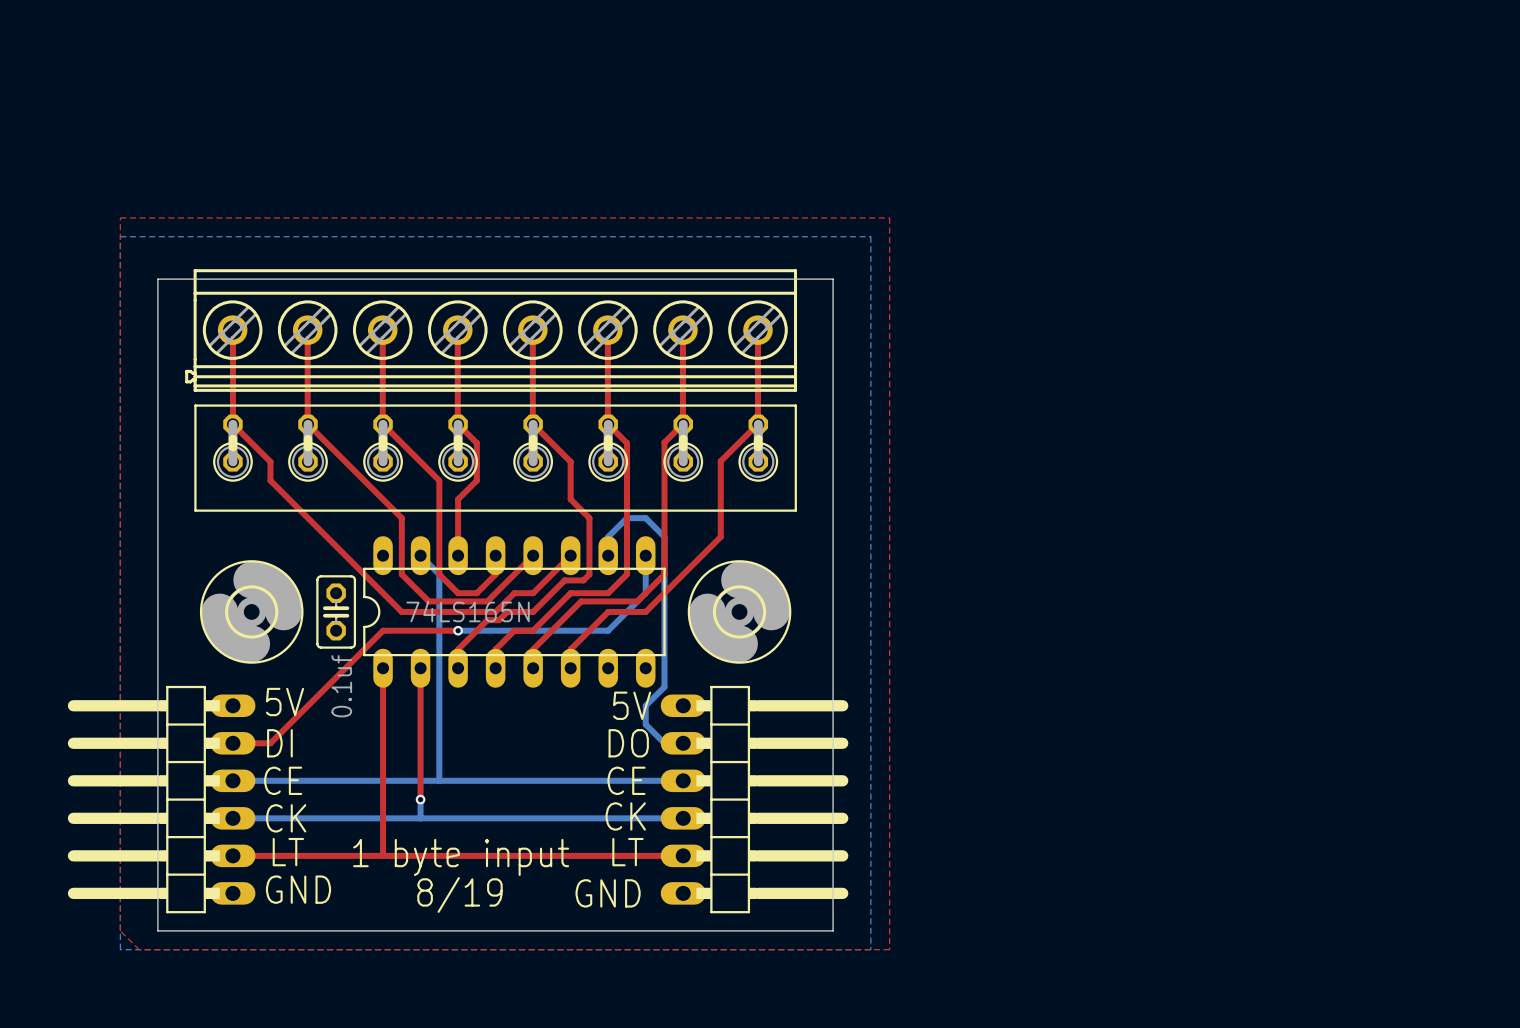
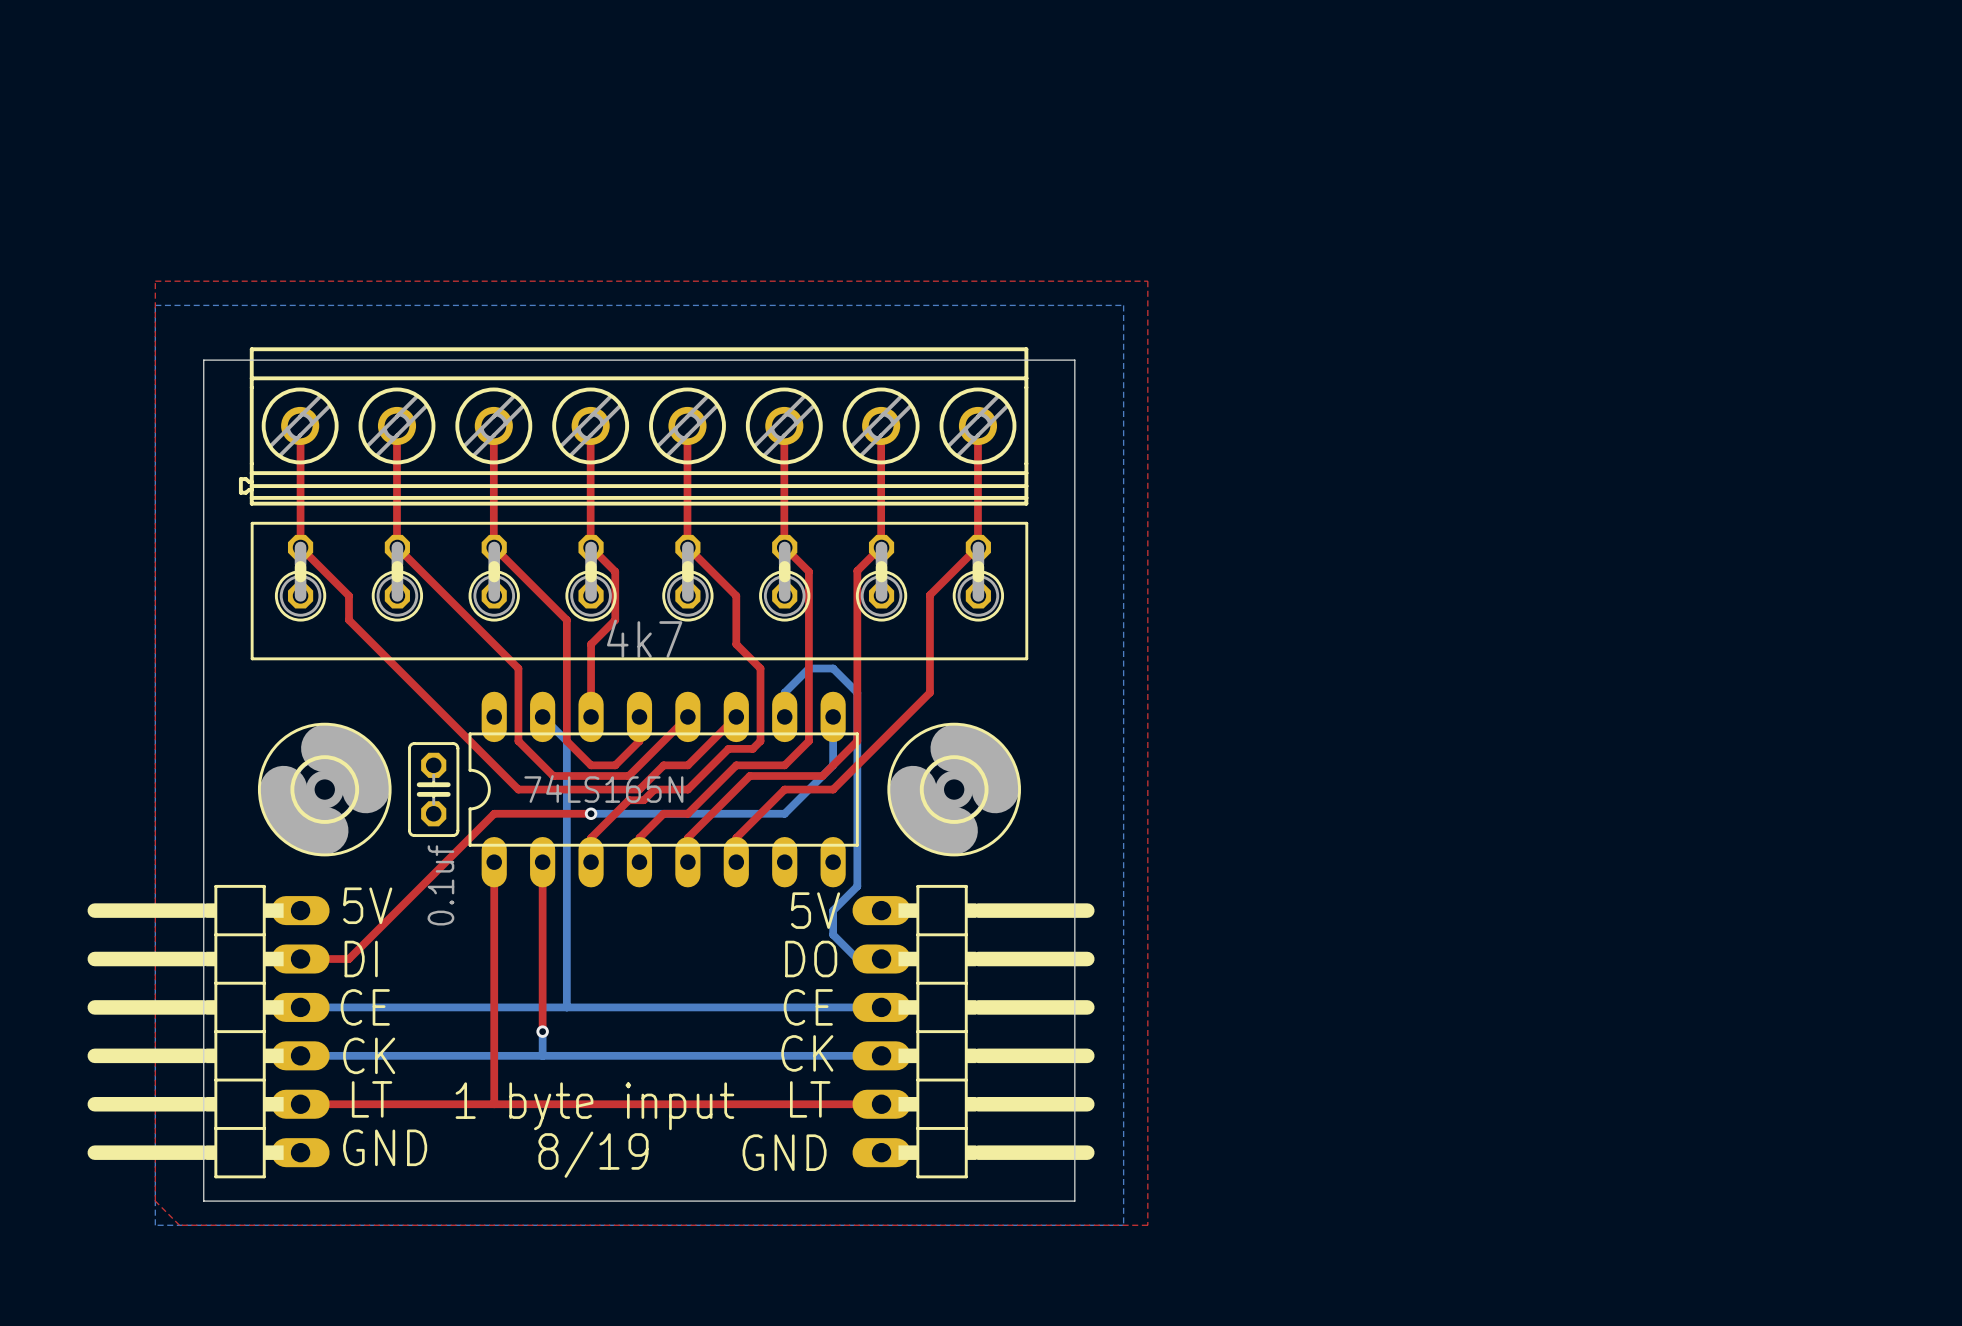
text: none -> 4k7 (644, 638)

